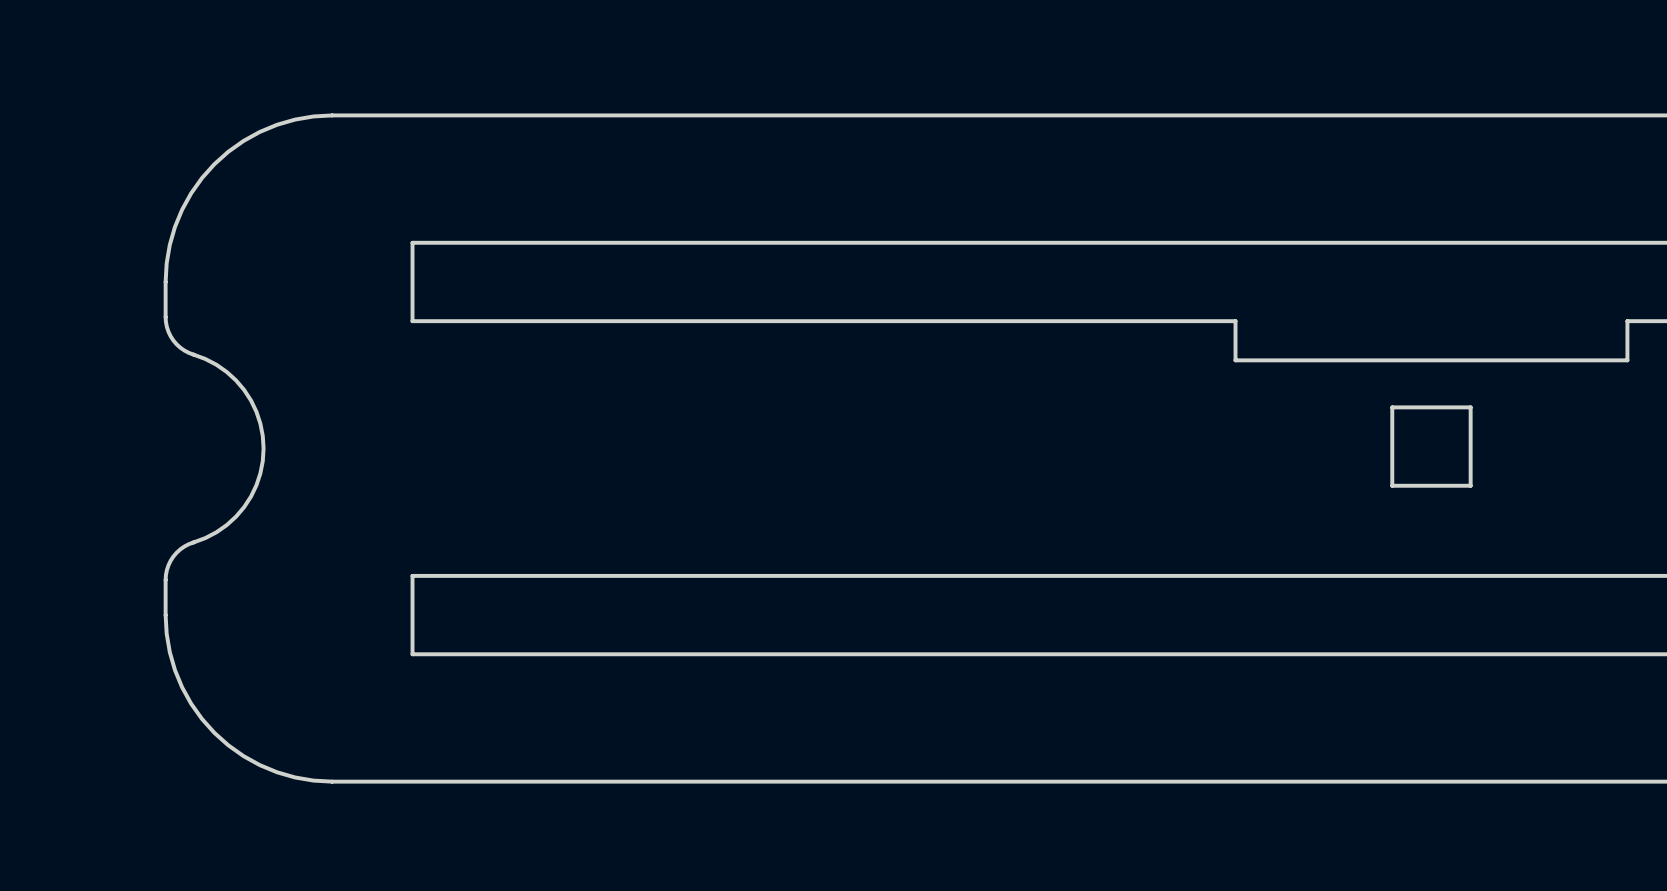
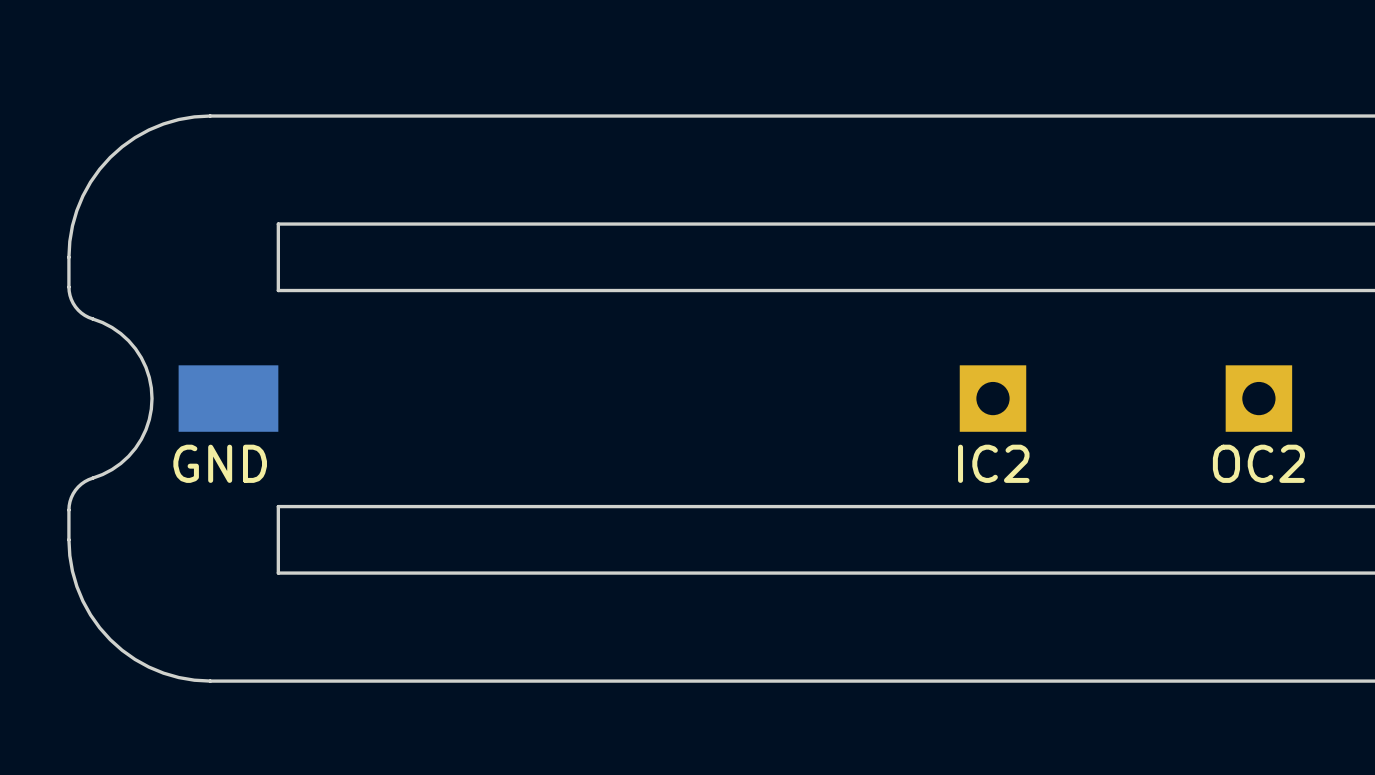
board edge: (1627, 321) (1627, 360) (1235, 360) (1235, 321) -> (1308, 290) (976, 290)
board edge: (1470, 407) (1470, 485) (1392, 485) (1392, 407) (1470, 407) -> none
GND: none -> (228, 398)
part: none -> (992, 398)
part: none -> (1258, 398)
text: none -> IC2 (993, 463)
text: none -> OC2 (1258, 463)

